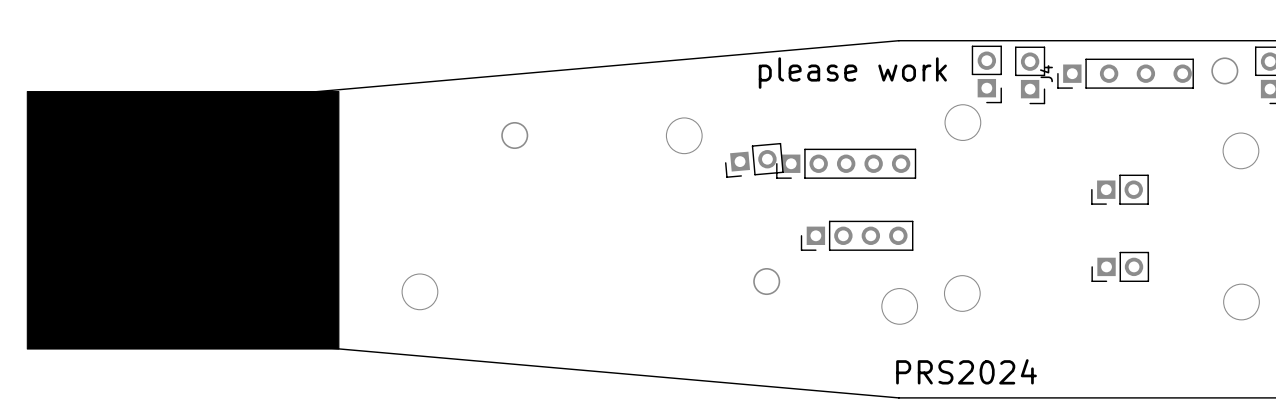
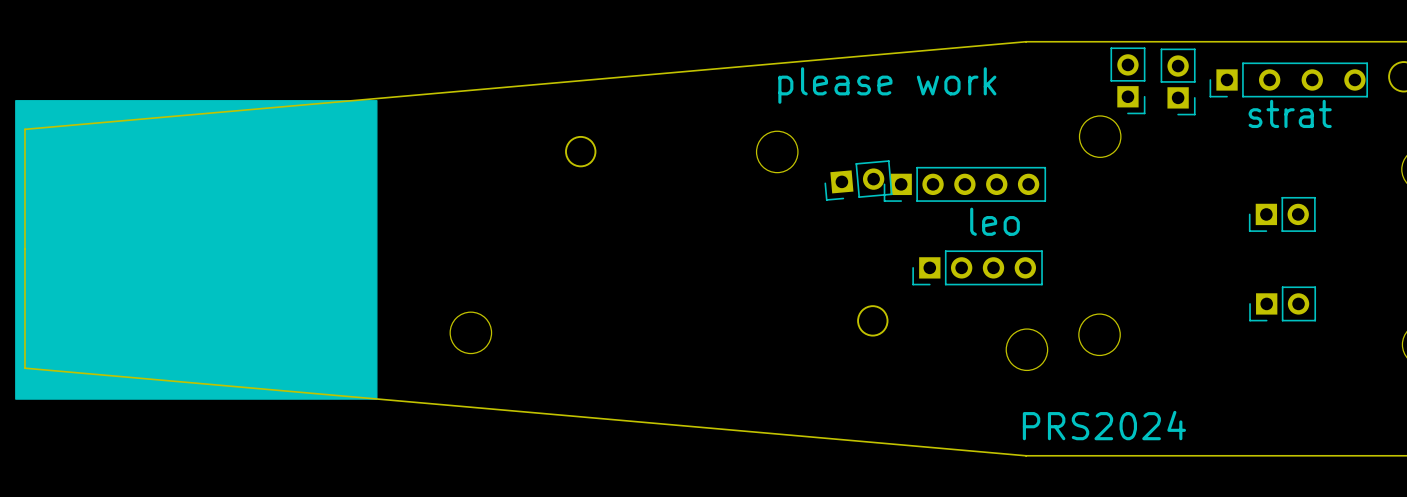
text position: please work (852, 73) -> please work (887, 85)
J4 name: J4 (1046, 73) -> none
text: none -> strat (1290, 113)
text: none -> leo (995, 221)

